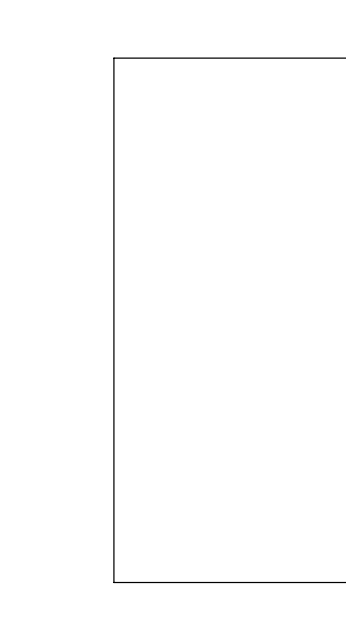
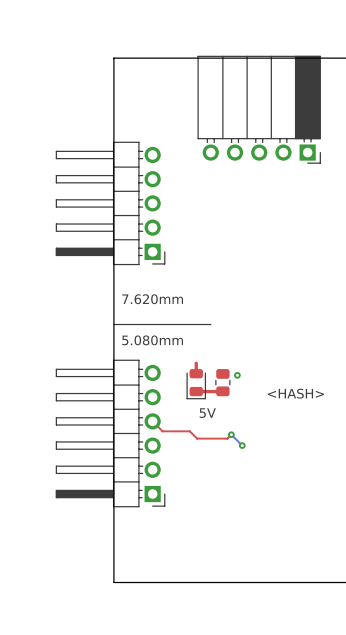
part: none -> (259, 109)
part: none -> (110, 203)
text: none -> 7.620mm (152, 299)
line: none -> (113, 324) (210, 324)
text: none -> 5.080mm (152, 340)
top track: none -> (196, 363) (196, 373)
via: none -> (237, 375)
part: none -> (222, 382)
part: none -> (196, 384)
top track: none -> (222, 391) (196, 391)
text: none -> <HASH> (295, 393)
text: none -> 5V (207, 413)
top track: none -> (152, 421) (162, 431) (189, 431) (197, 438) (227, 438) (231, 434)
part: none -> (110, 433)
bottom track: none -> (231, 434) (242, 445)
via: none -> (231, 434)
via: none -> (242, 445)

